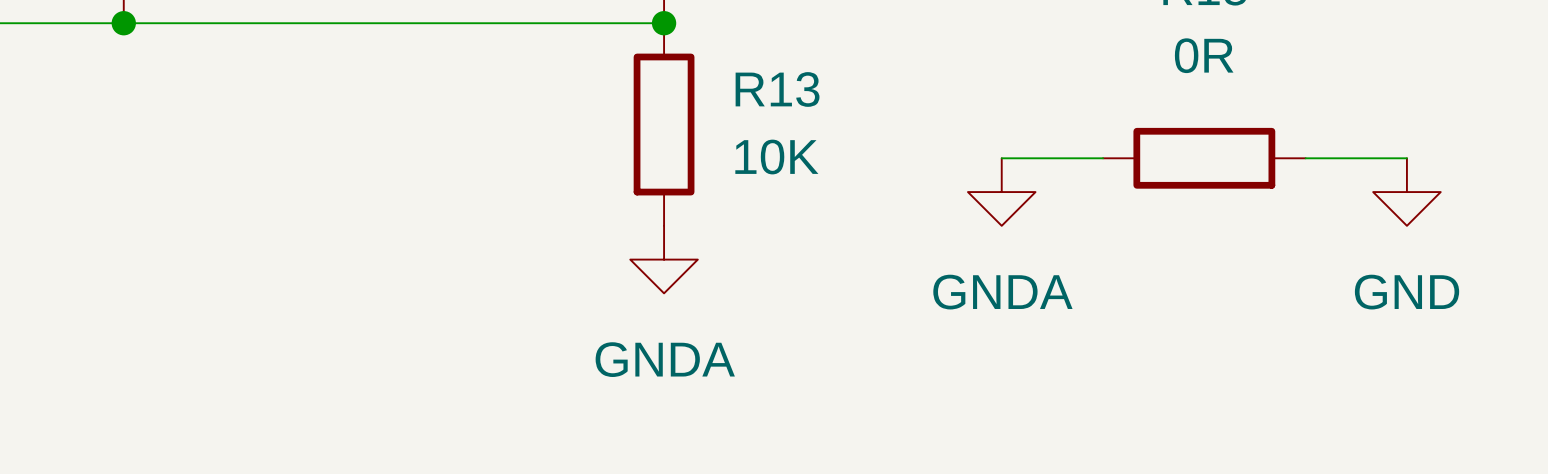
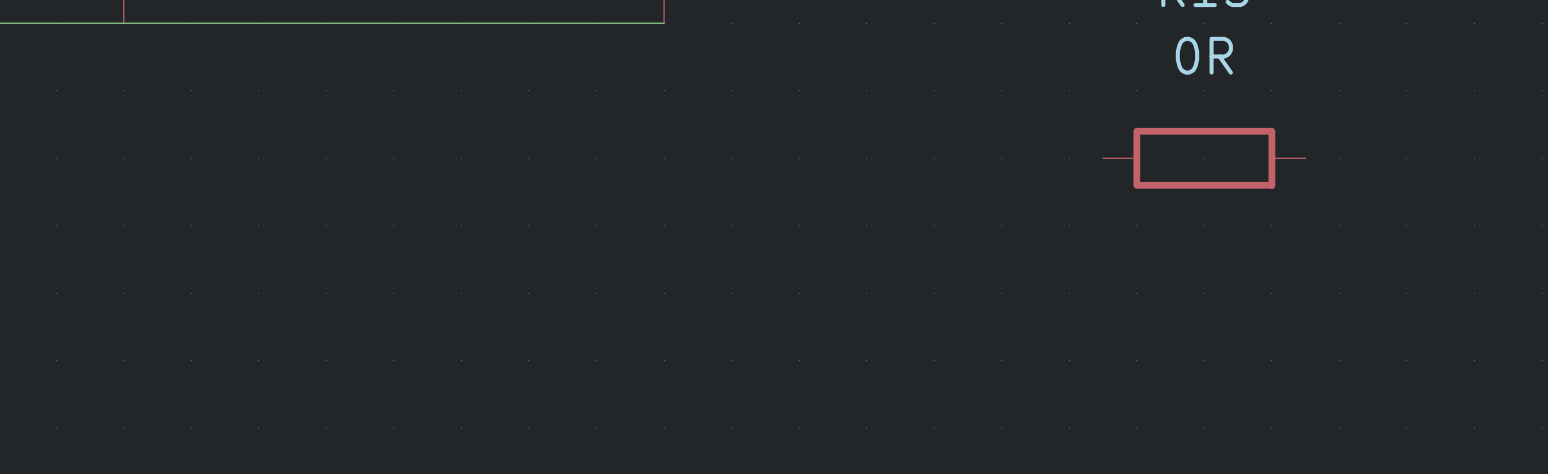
junction: (123, 23) -> none
junction: (664, 23) -> none
R13: 10K (664, 124) -> none
wire: (1001, 158) (1103, 158) -> none
wire: (1305, 158) (1406, 158) -> none
power symbol: GNDA (1001, 192) -> none
power symbol: GND (1406, 192) -> none
power symbol: GNDA (664, 259) -> none

